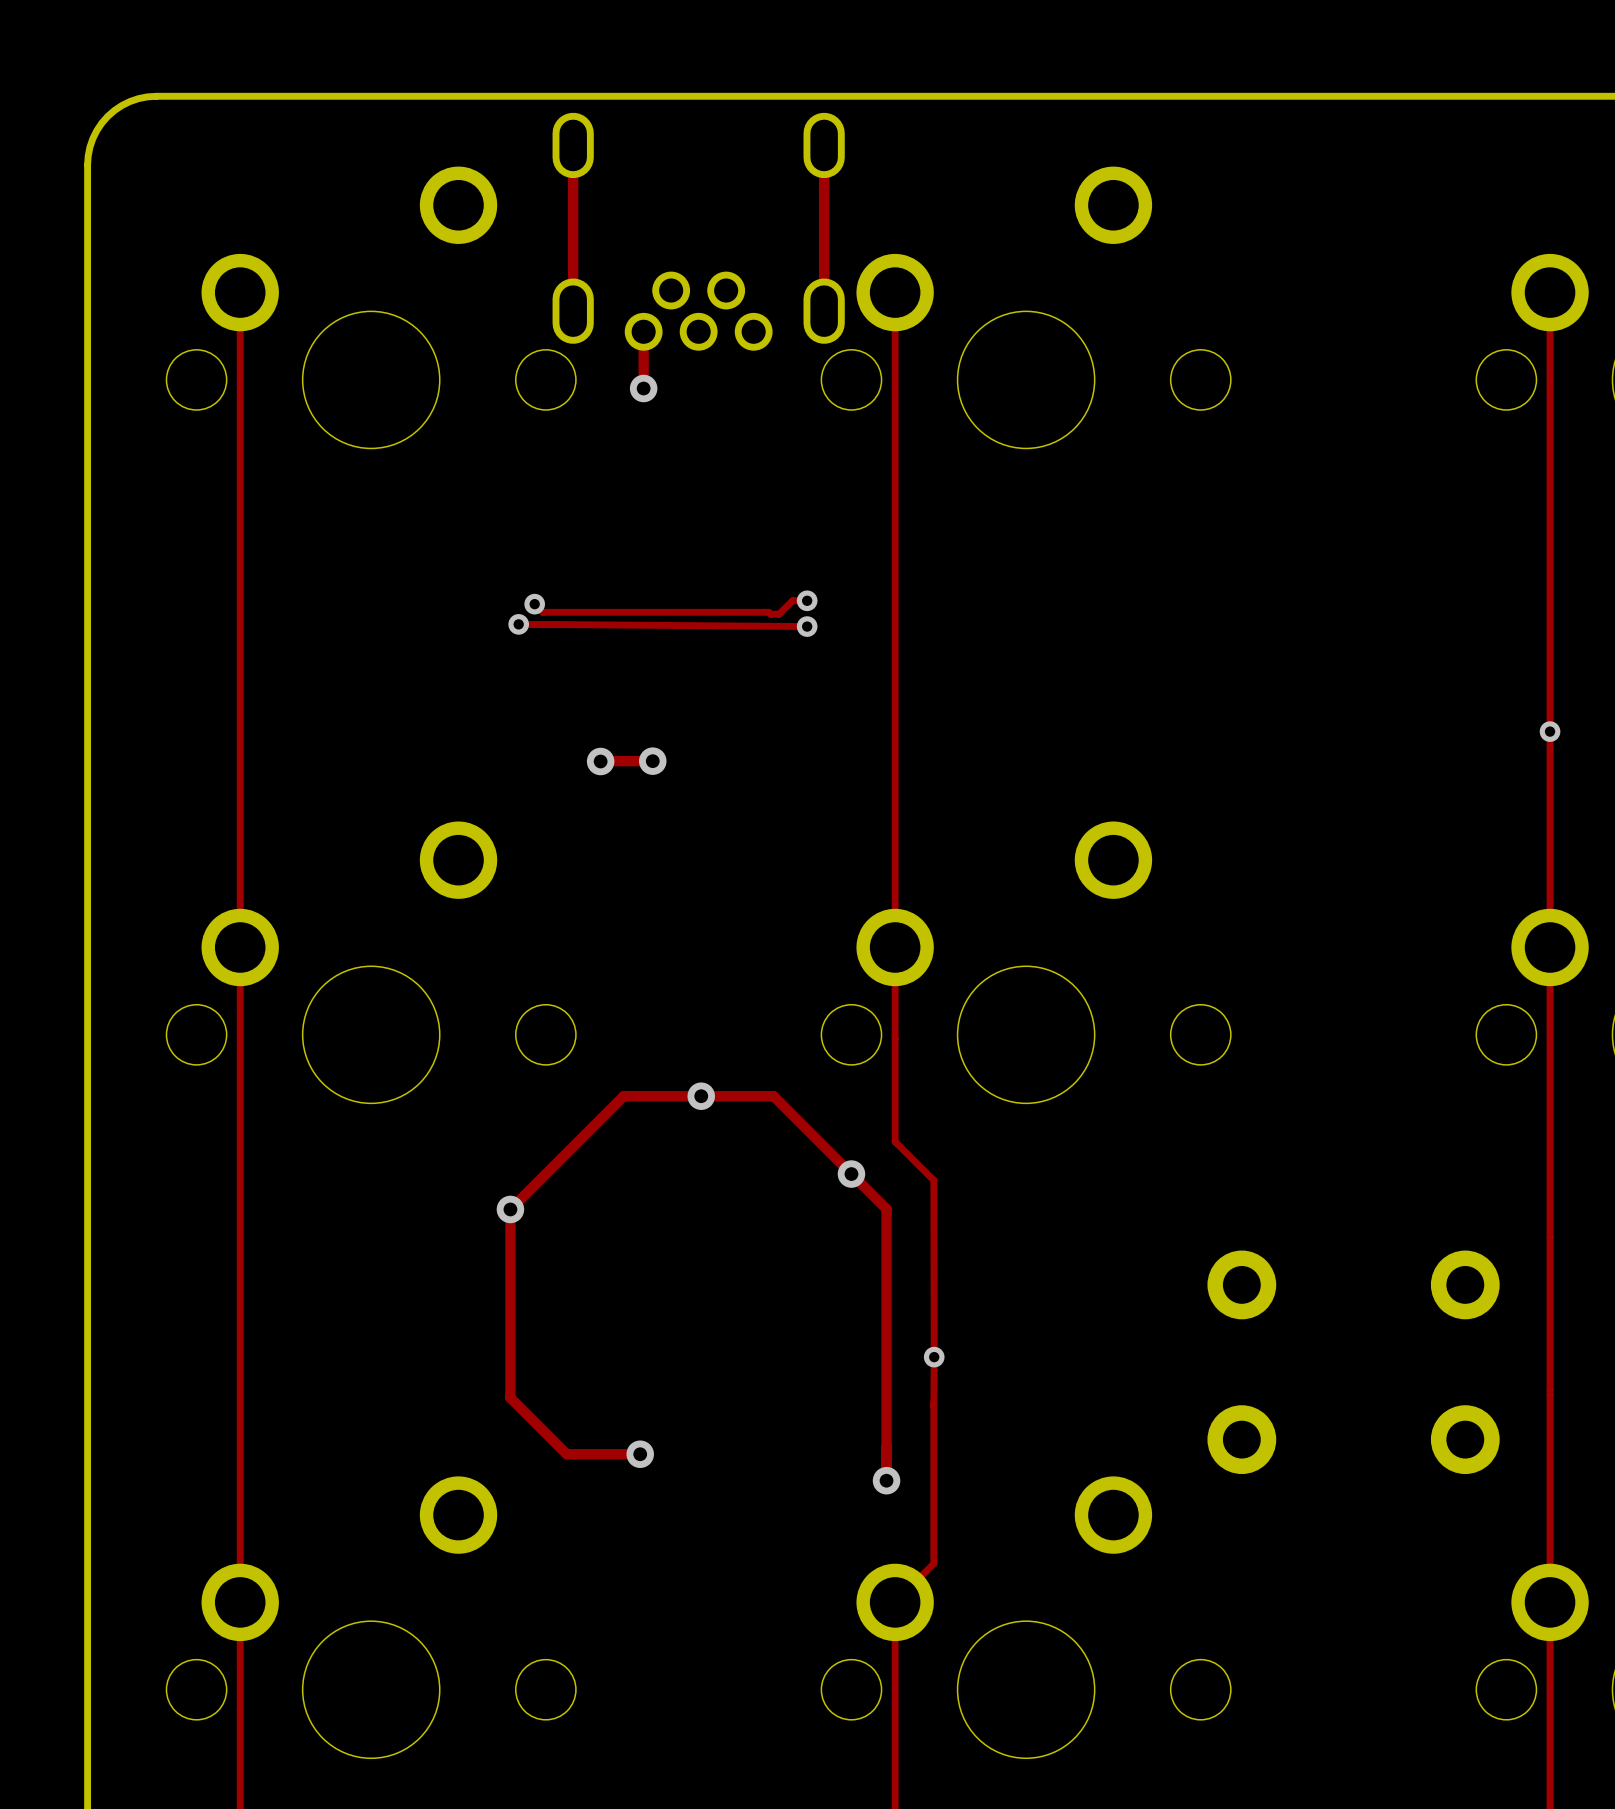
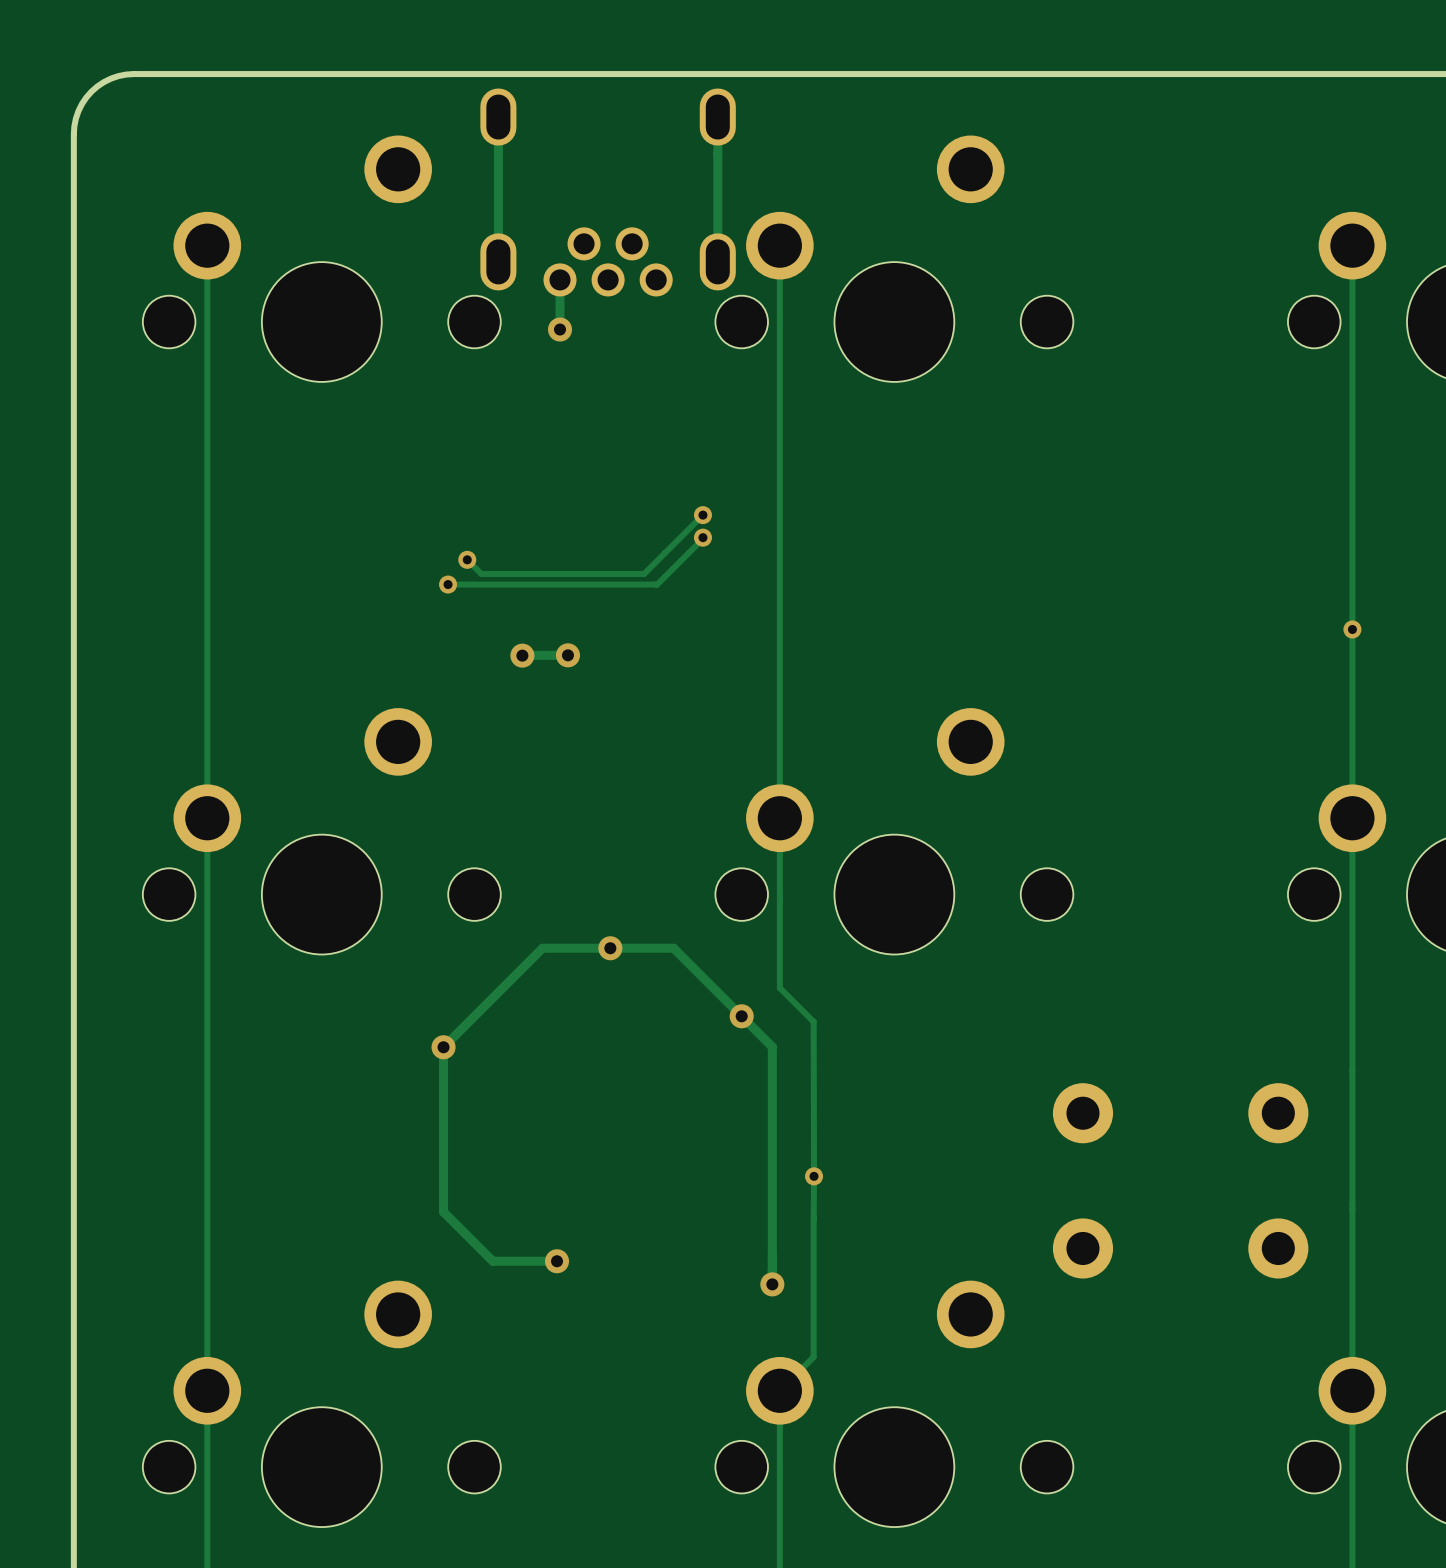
track: (807, 600) (792, 600) (779, 614) (770, 614) (768, 612) (542, 612) (534, 604) -> (702, 515) (644, 574) (481, 574) (467, 559)
via: (534, 604) -> none
track: (518, 624) (807, 626) -> (448, 584) (657, 584) (702, 538)
via: (518, 624) -> none
via: none -> (467, 559)
via: none -> (448, 584)

